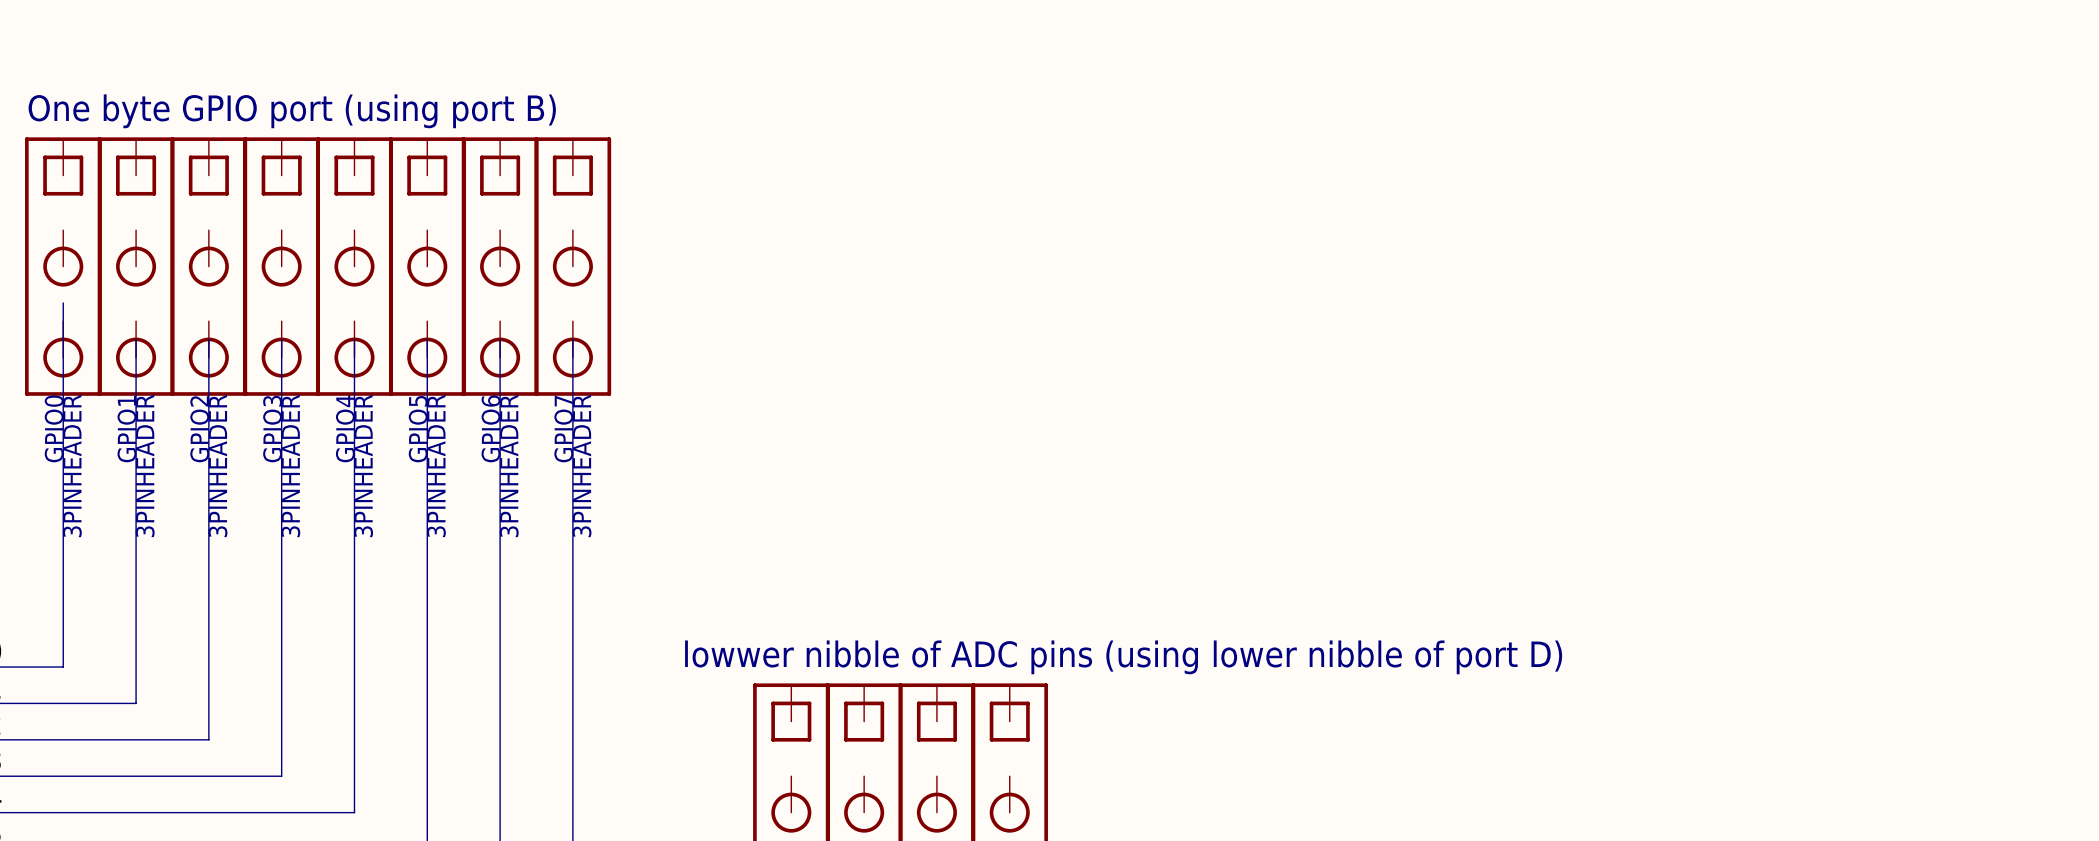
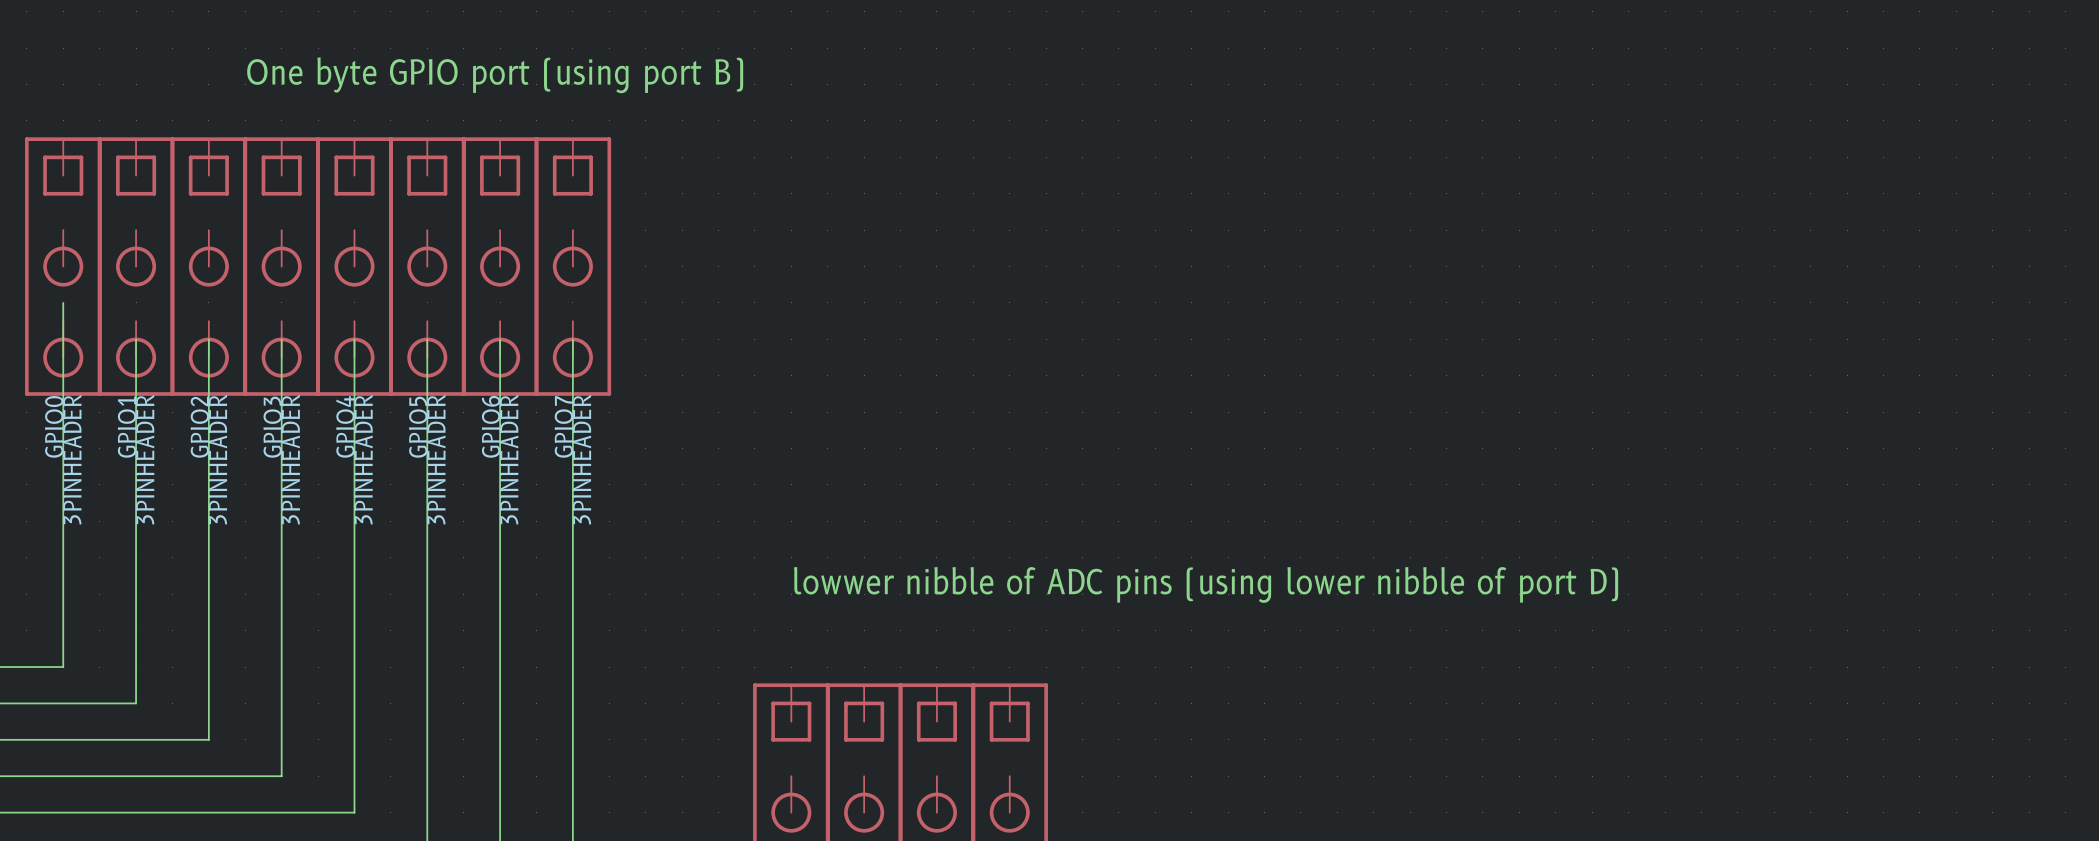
text position: One byte GPIO port (using port B) (292, 111) -> One byte GPIO port (using port B) (495, 75)
text position: lowwer nibble of ADC pins (using lower nibble of port D) (1123, 657) -> lowwer nibble of ADC pins (using lower nibble of port D) (1206, 584)

